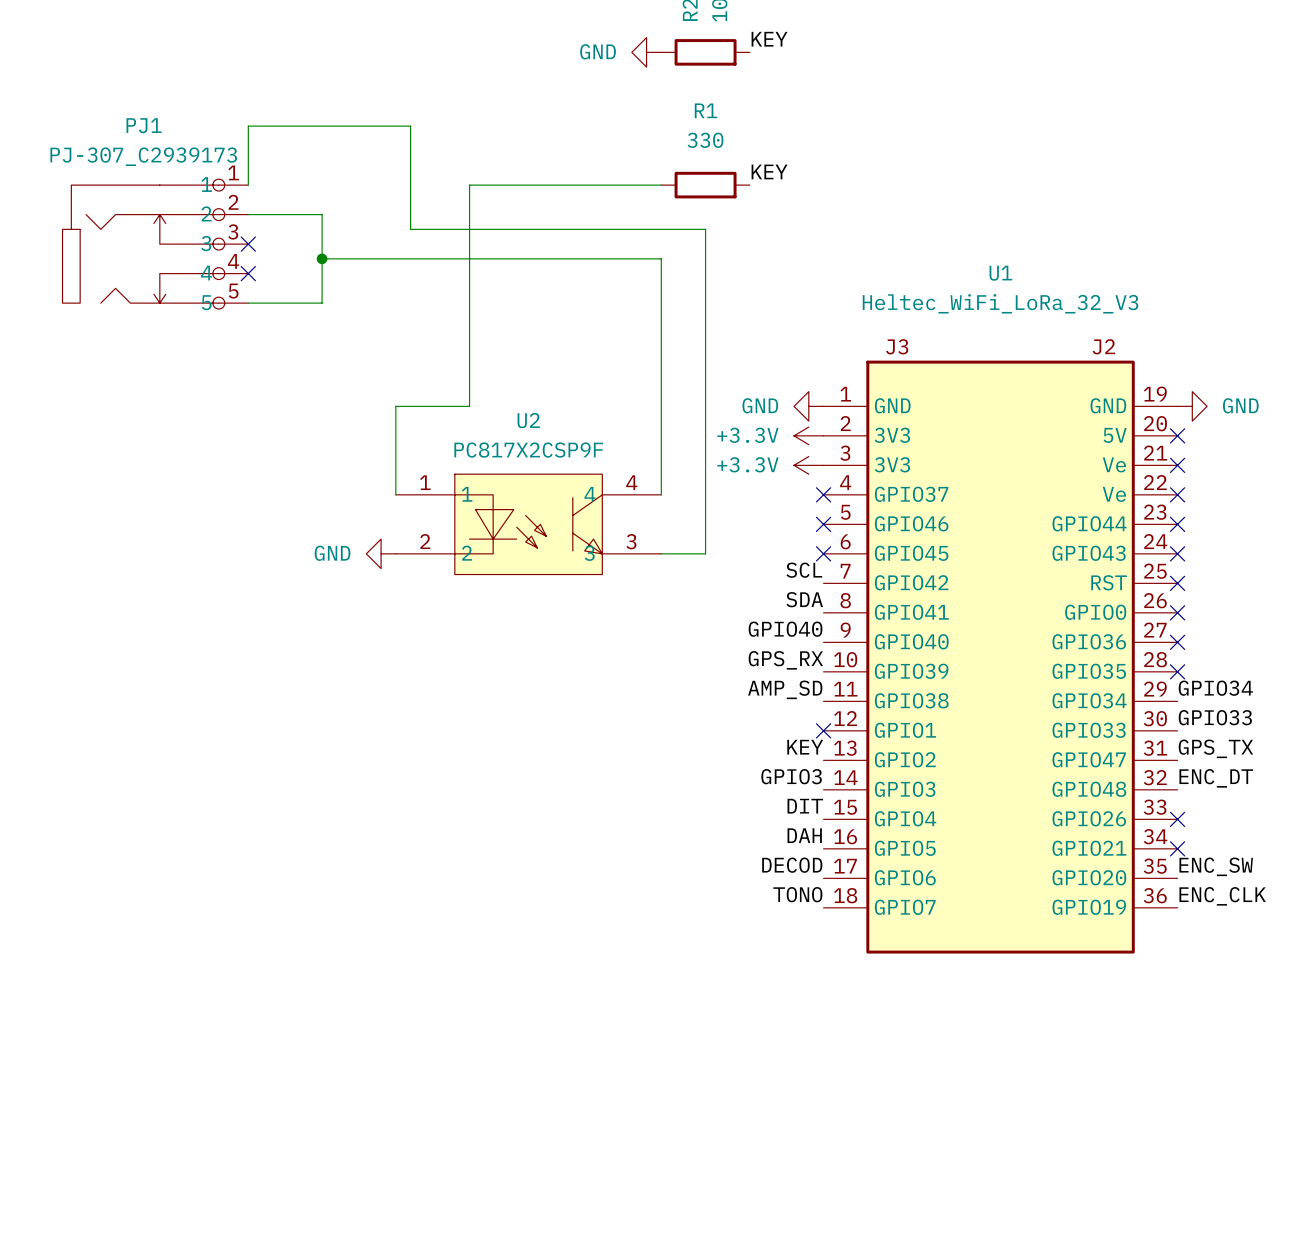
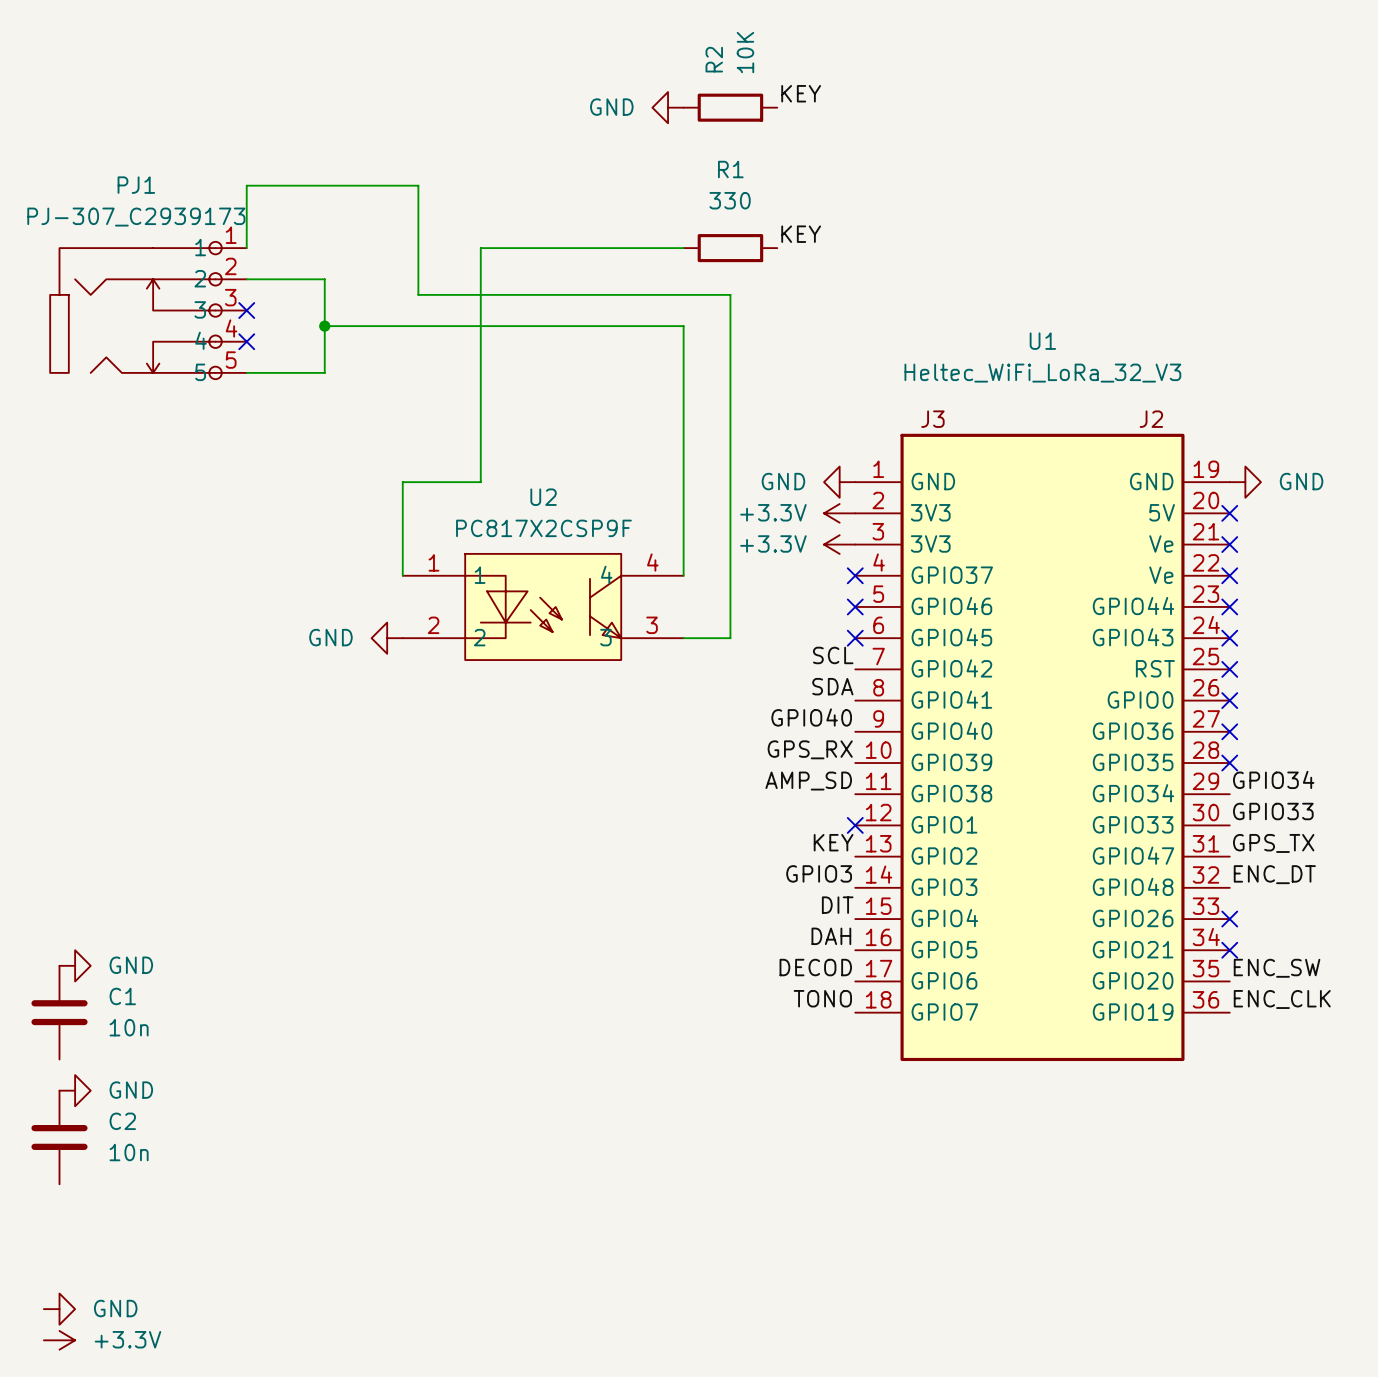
power symbol: none -> GND (75, 965)
C1: none -> 10n (59, 1012)
power symbol: none -> GND (75, 1090)
C2: none -> 10n (59, 1137)
power symbol: none -> GND (59, 1309)
power symbol: none -> +3.3V (59, 1340)

